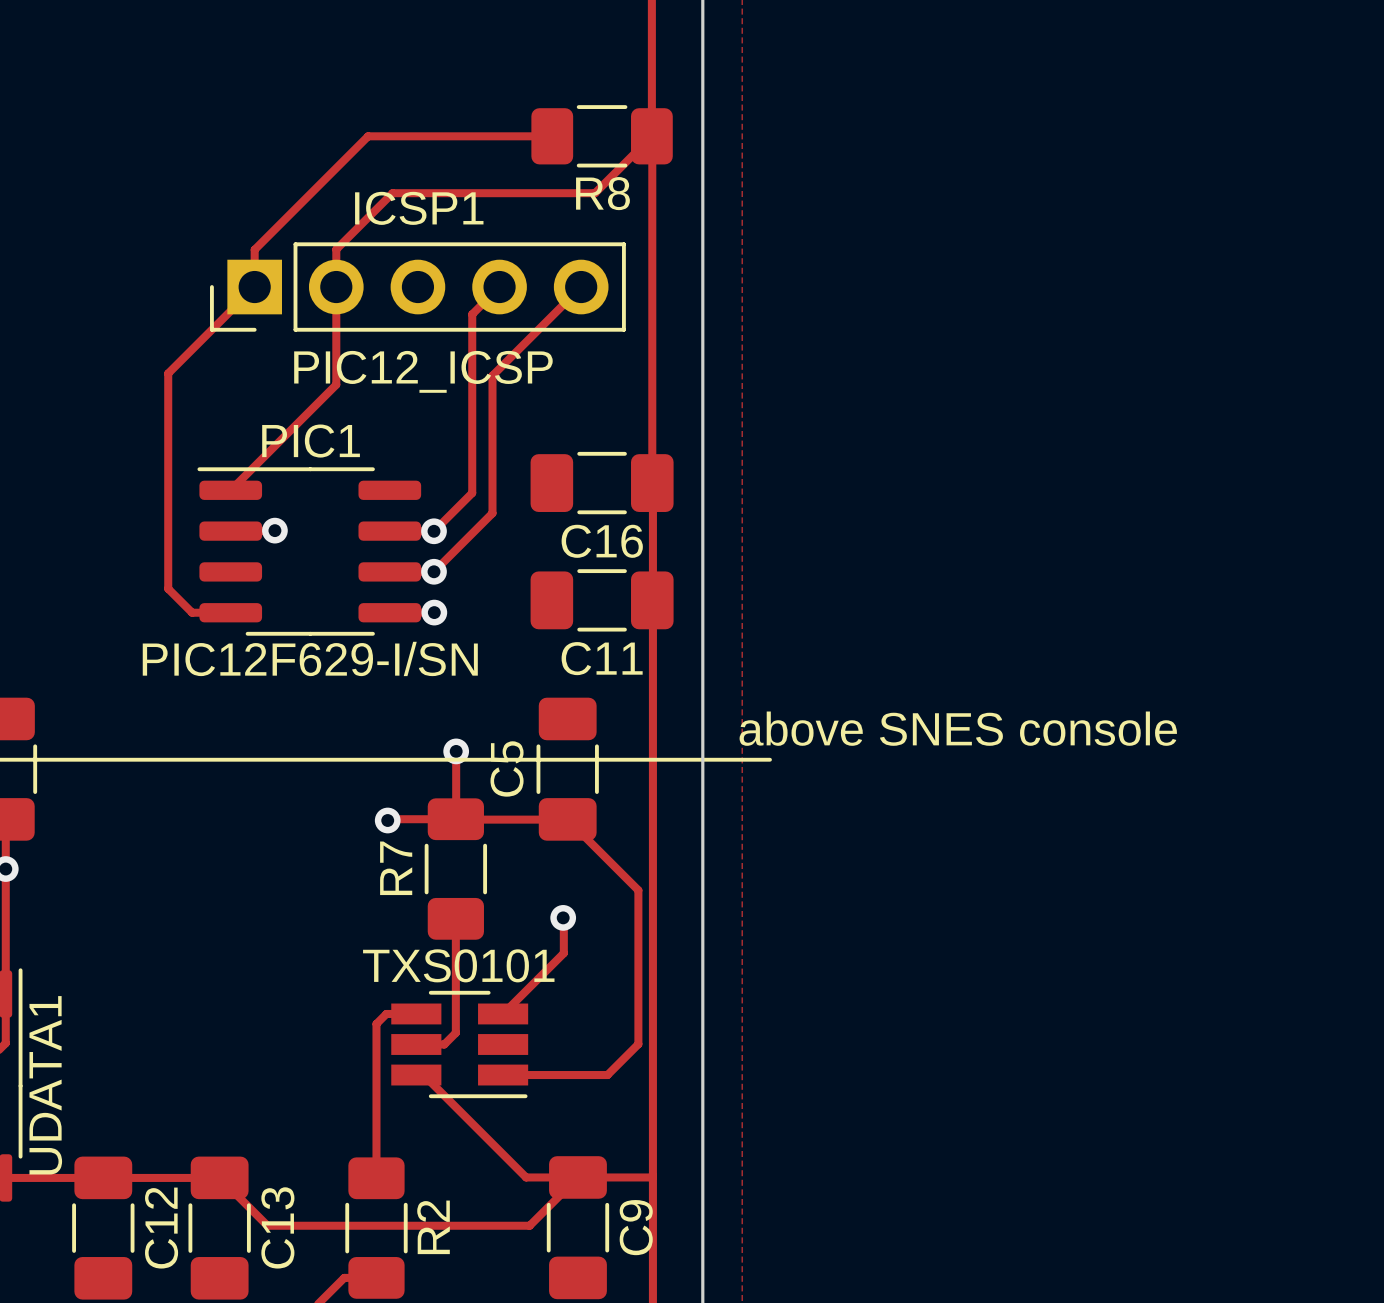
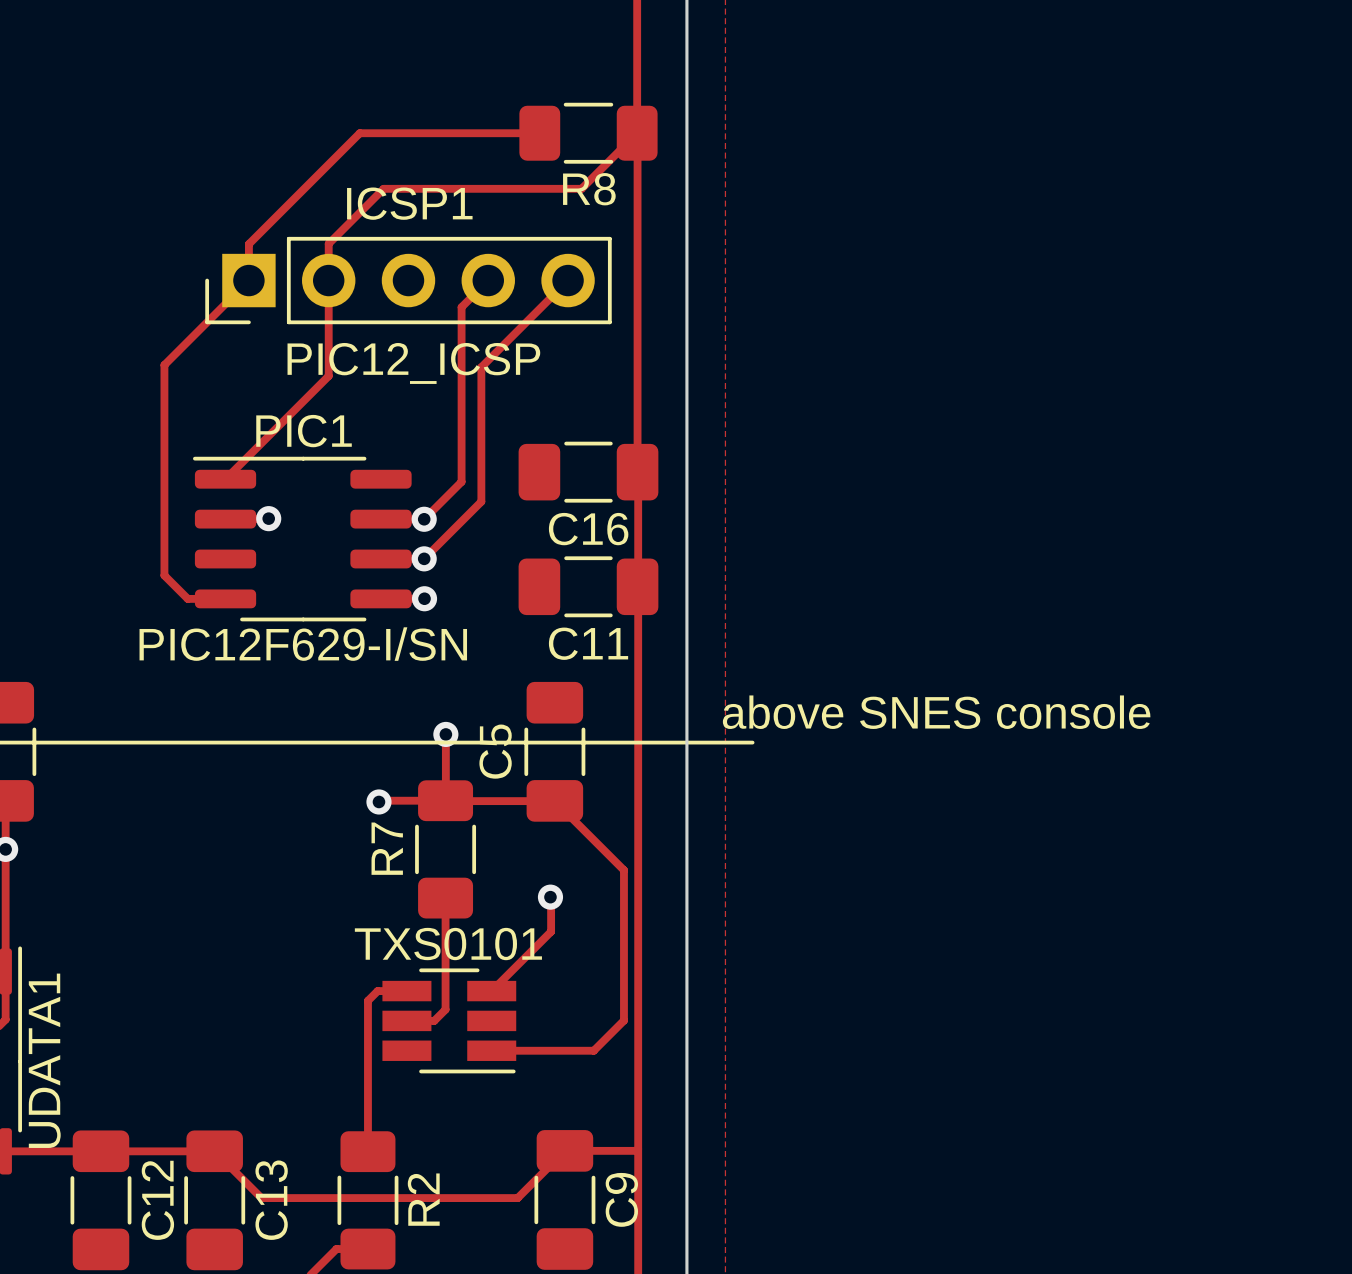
track: (416, 1075) (423, 1075) (526, 1177) (577, 1177) -> none

